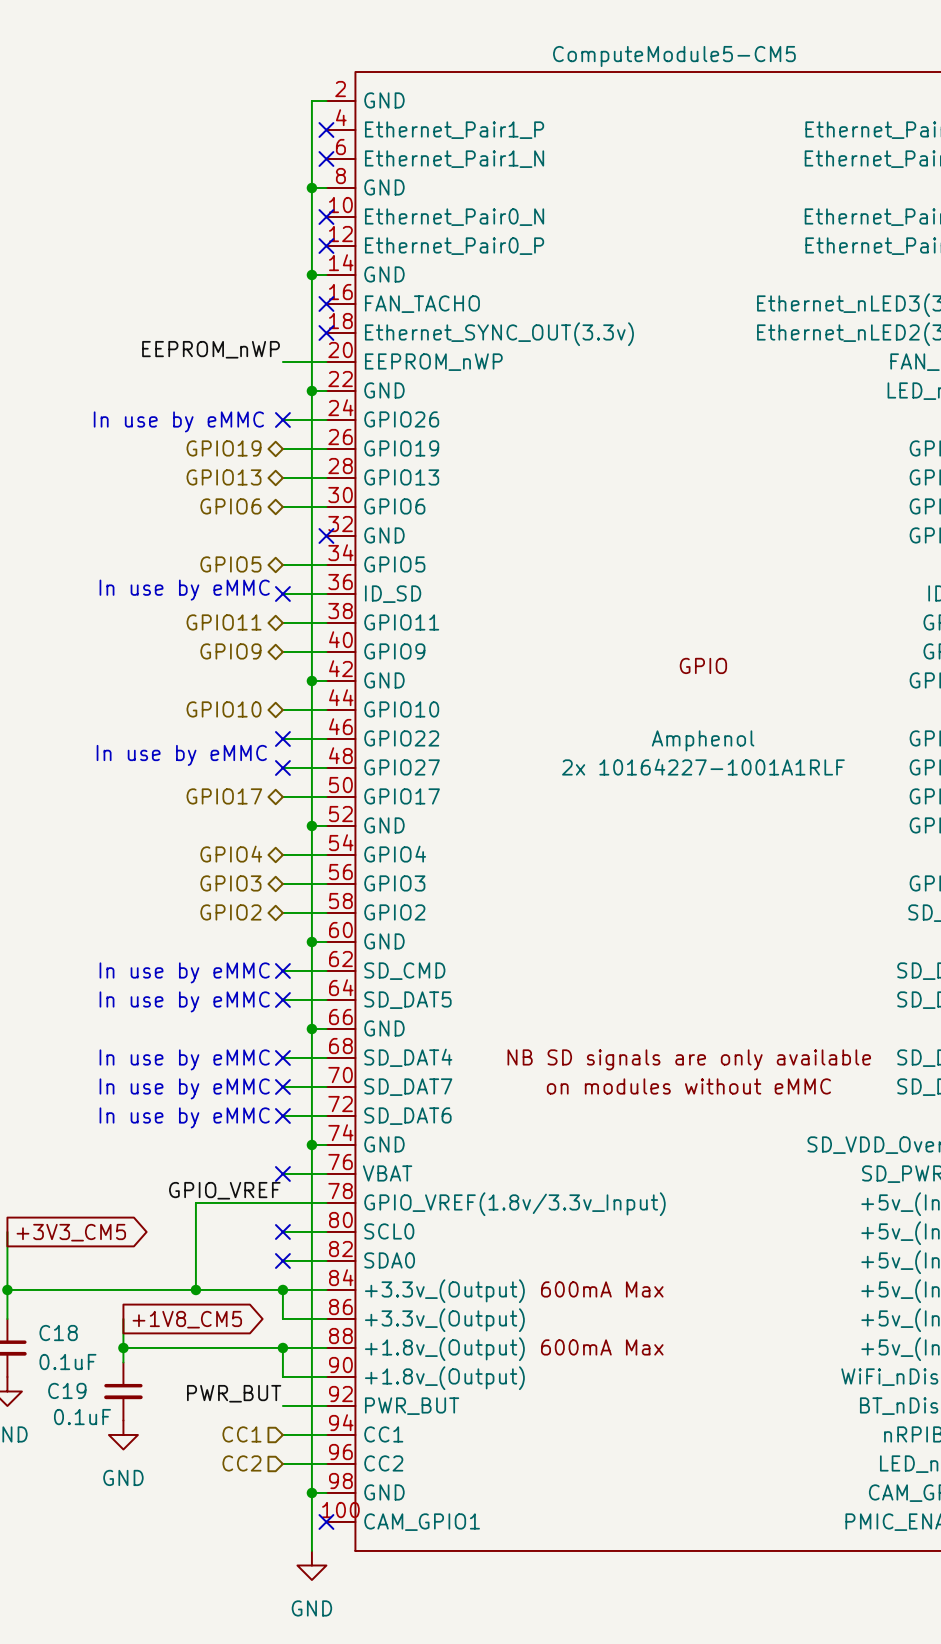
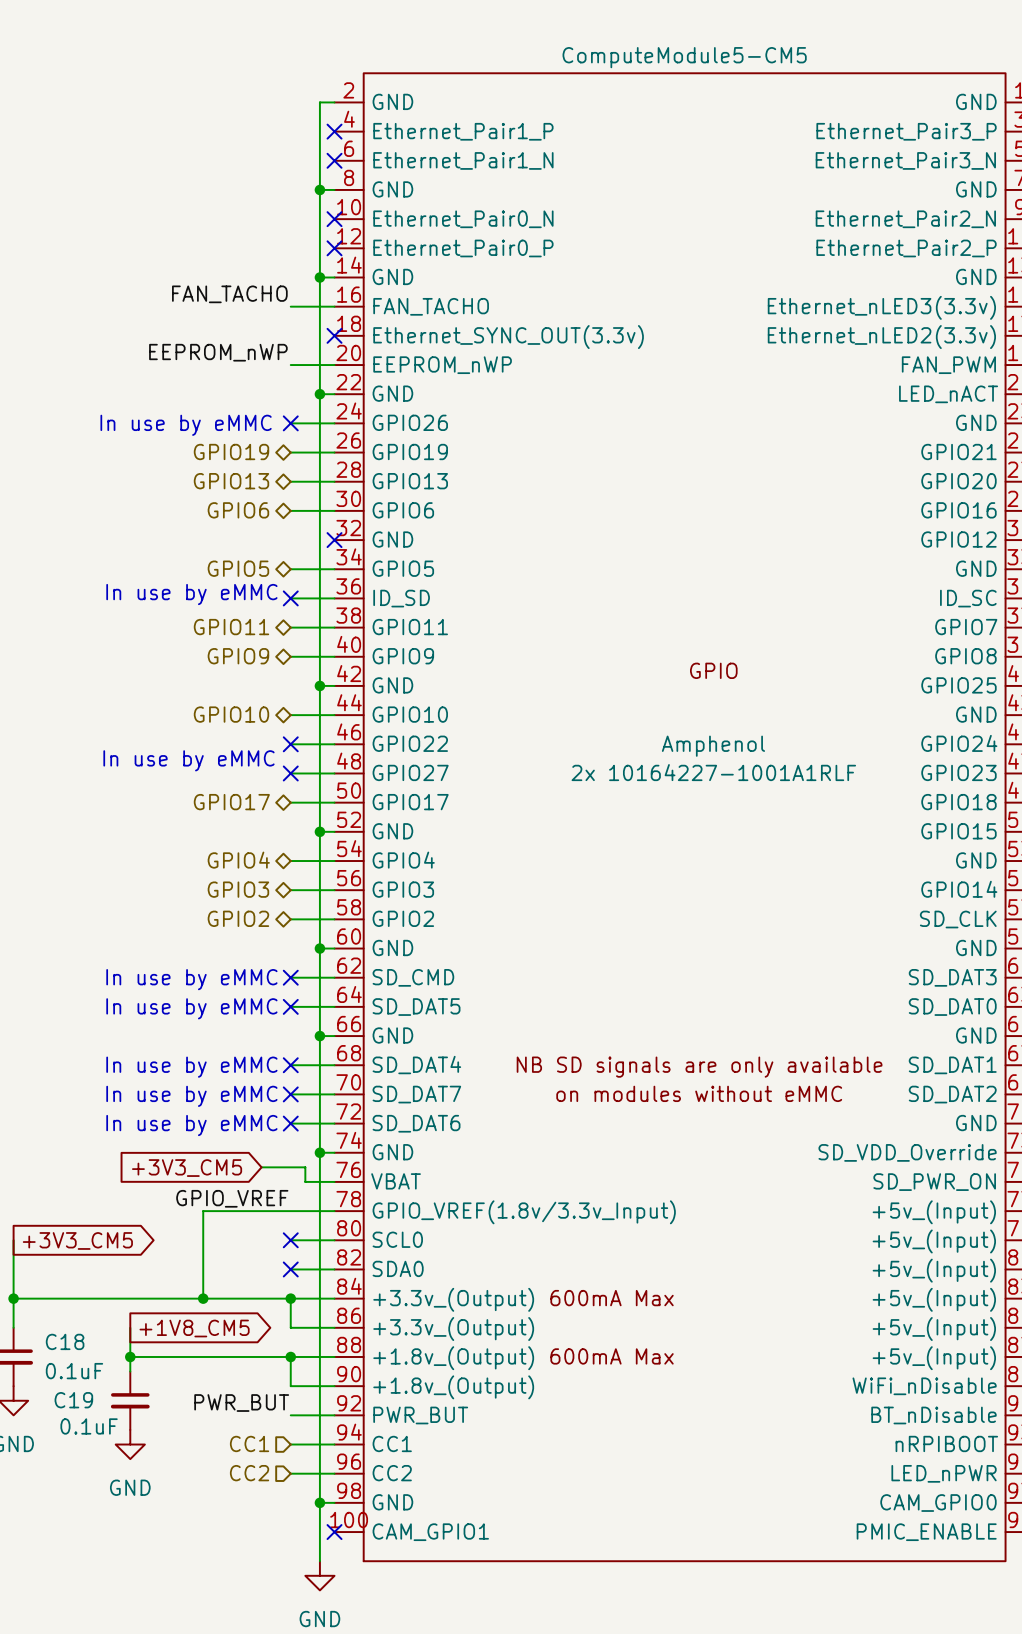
label: none -> FAN_TACHO (229, 294)
wire: none -> (290, 306) (334, 306)
no-connect mark: (326, 303) -> none
global label: none -> +3V3_CM5 (187, 1168)
wire: (282, 1173) (297, 1173) -> (261, 1167) (305, 1167) (305, 1181)
no-connect mark: (282, 1173) -> none

